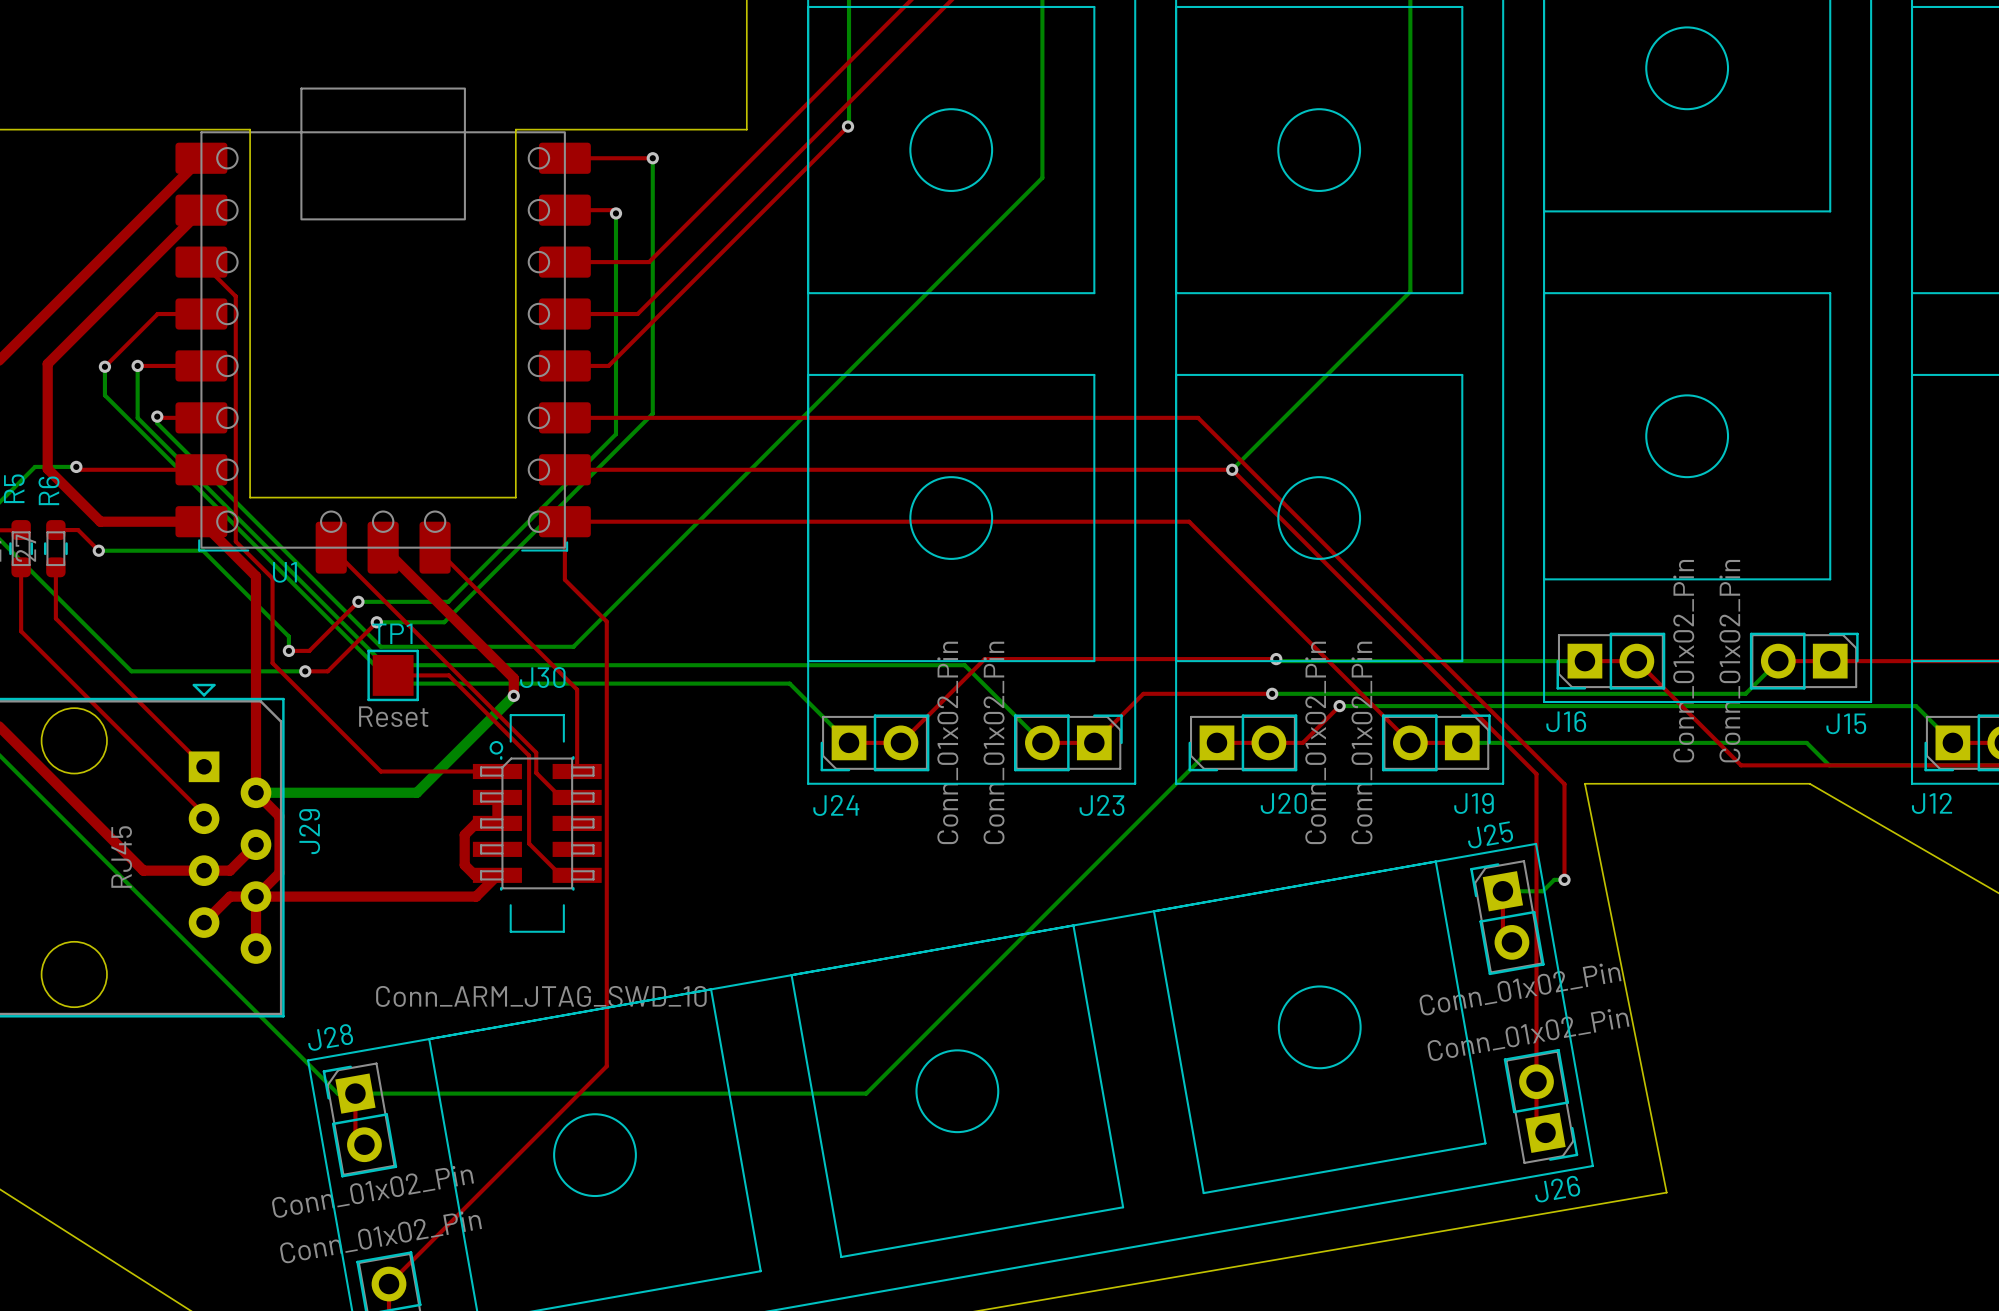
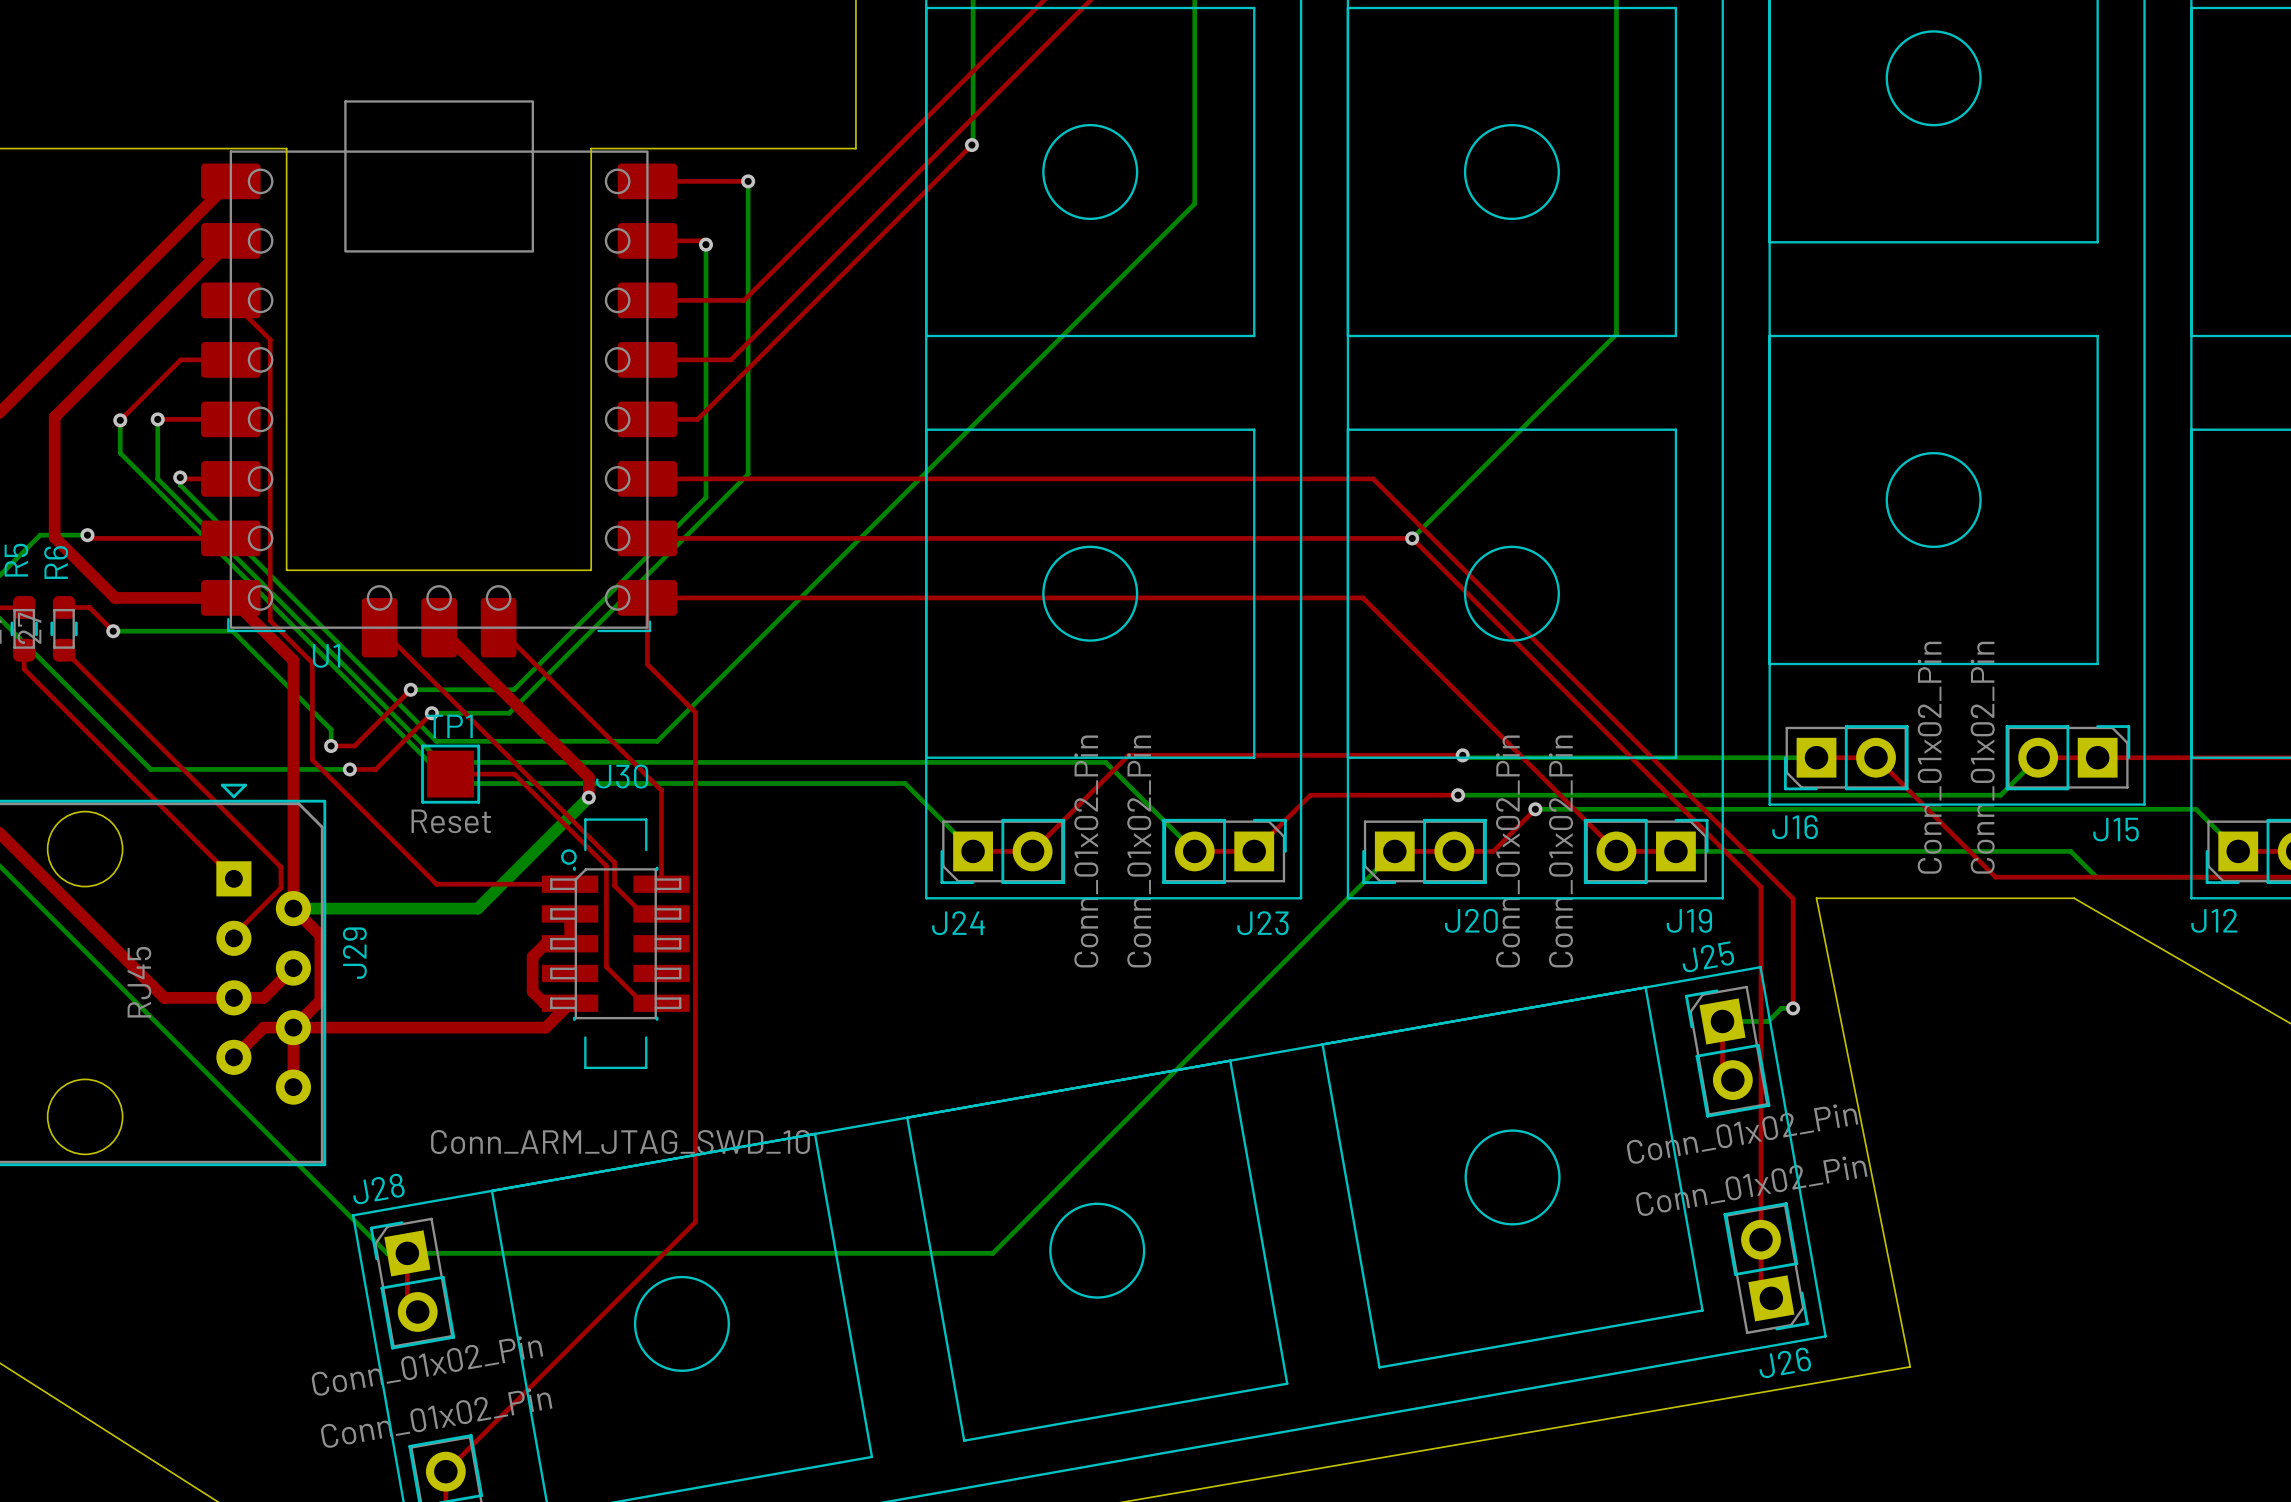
top track: (55, 567) (55, 618) -> (24, 669) (64, 708)
top track: none -> (64, 650) (280, 867) (280, 887) (233, 934)
top track: (21, 583) (21, 631) (204, 814) -> none

